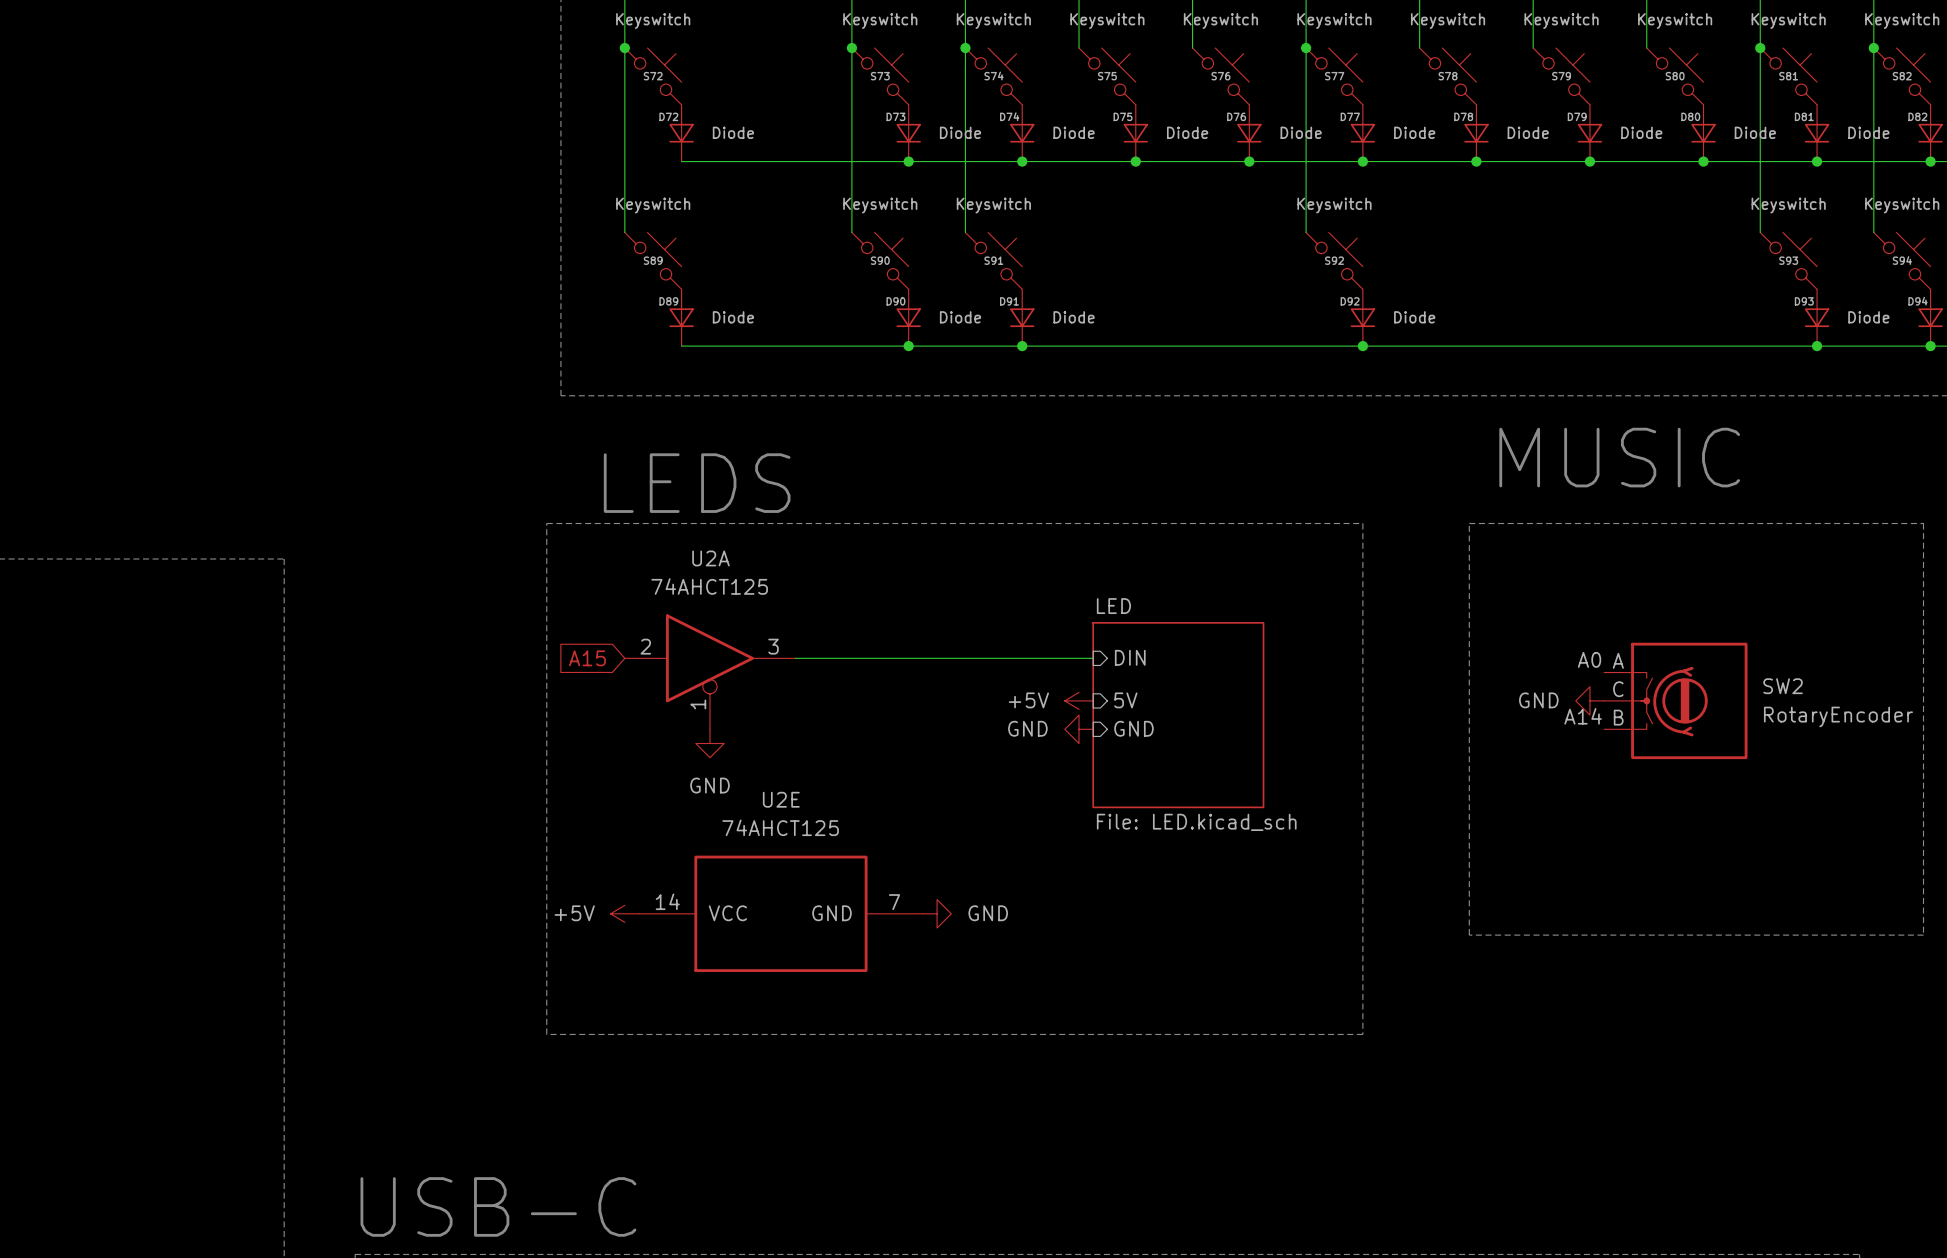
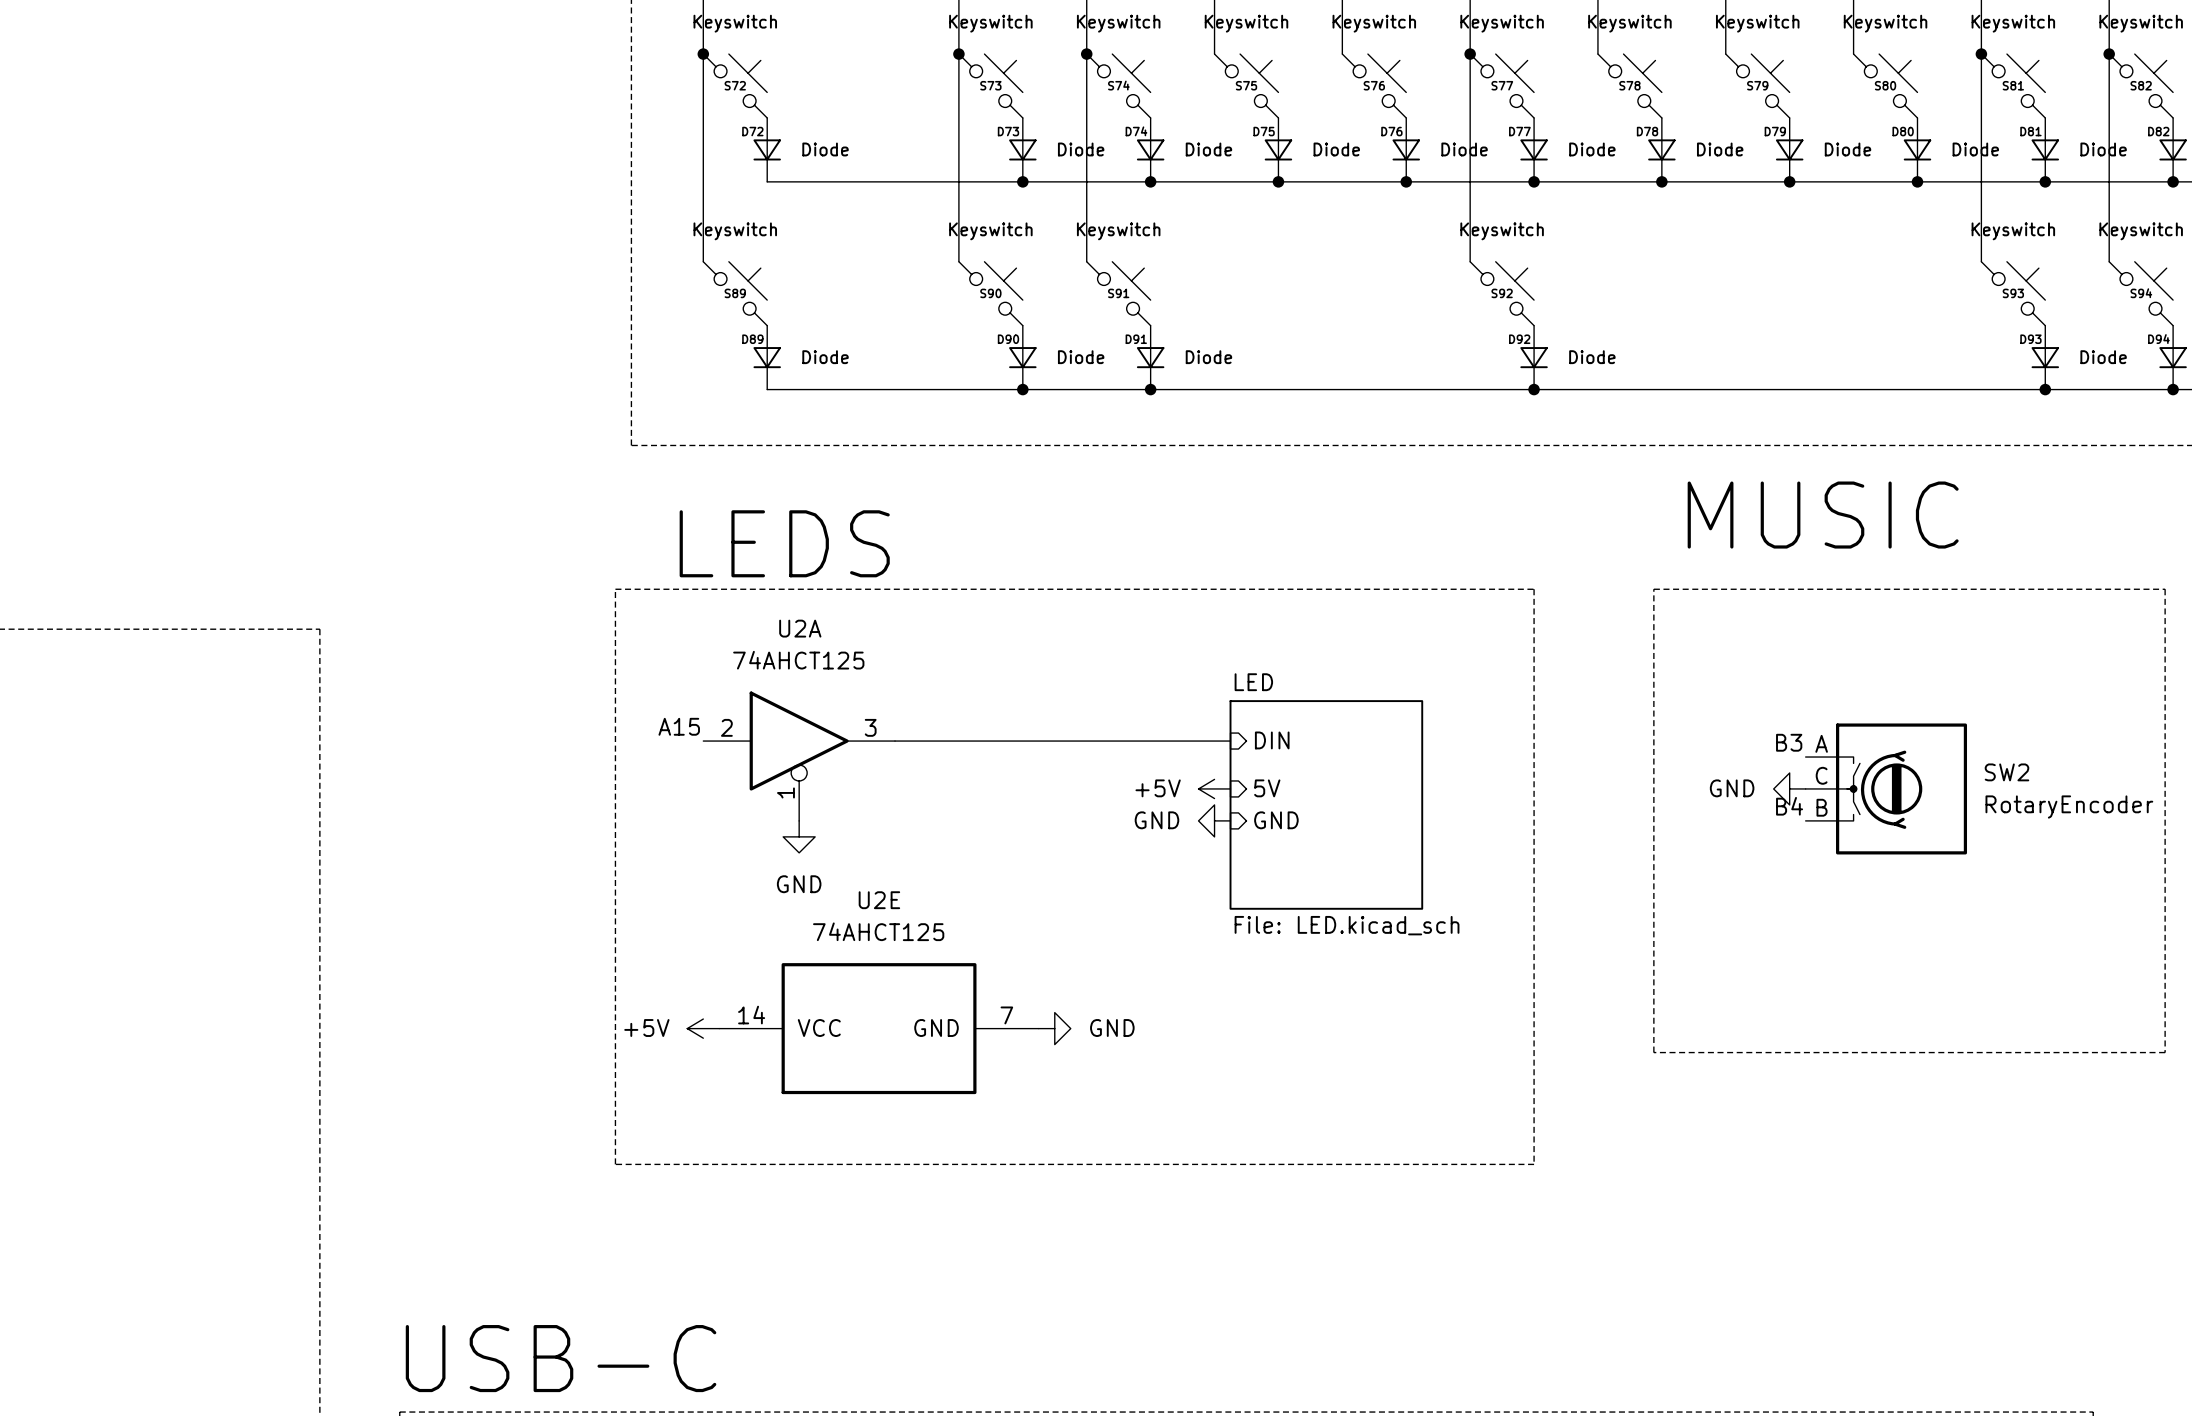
label: none -> A15 (679, 726)
global label: A15 (587, 658) -> none
label: A0 (1589, 659) -> B3 (1789, 742)
label: A14 (1583, 716) -> B4 (1789, 806)

